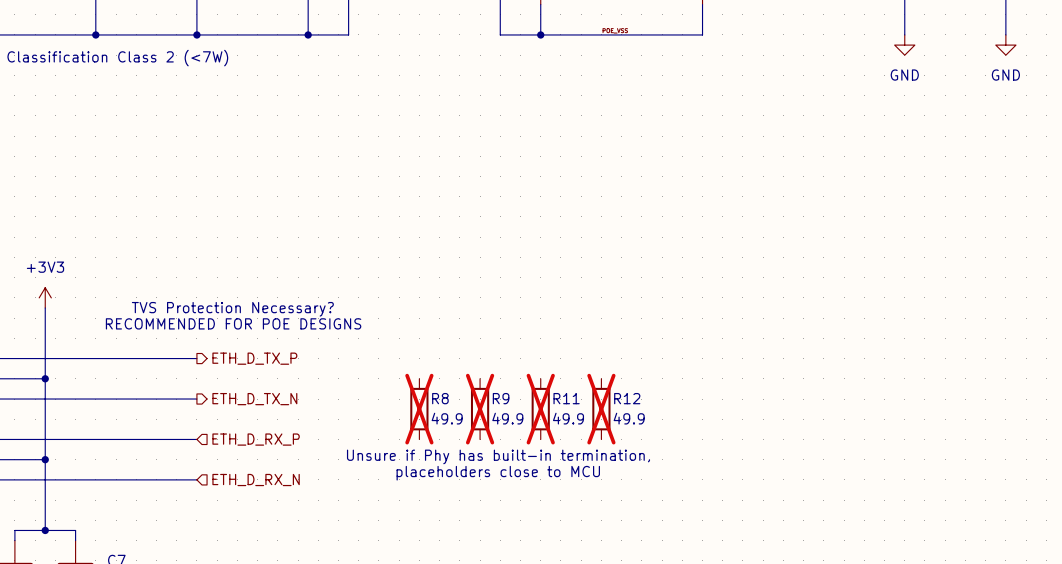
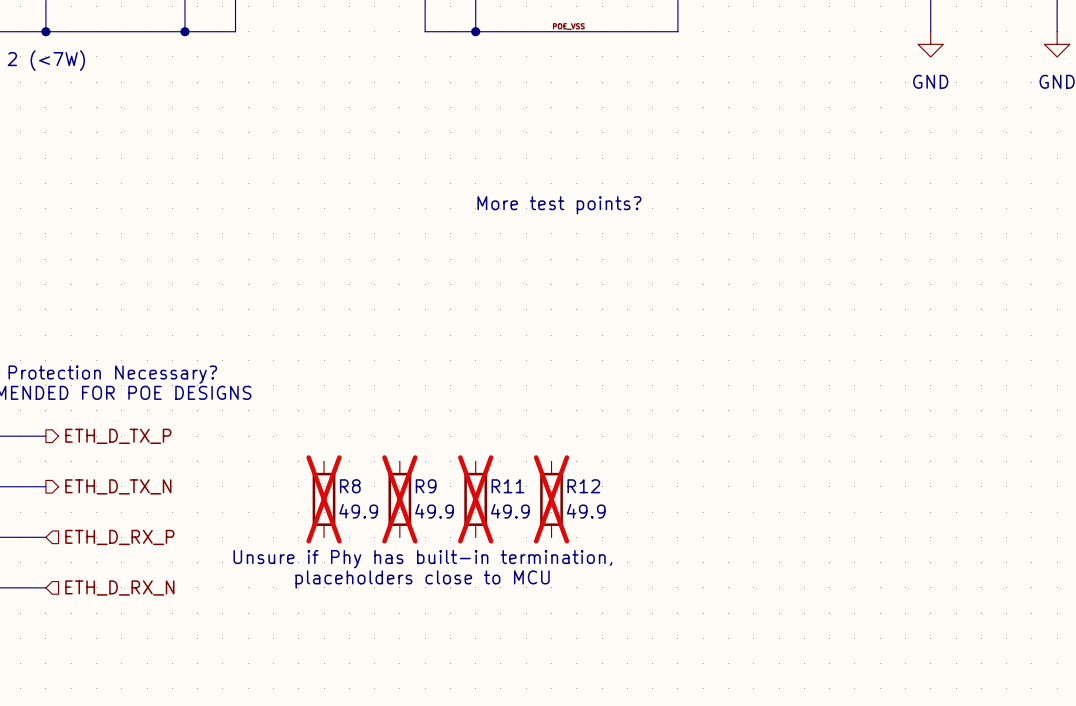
text: none -> More test points? (559, 205)

